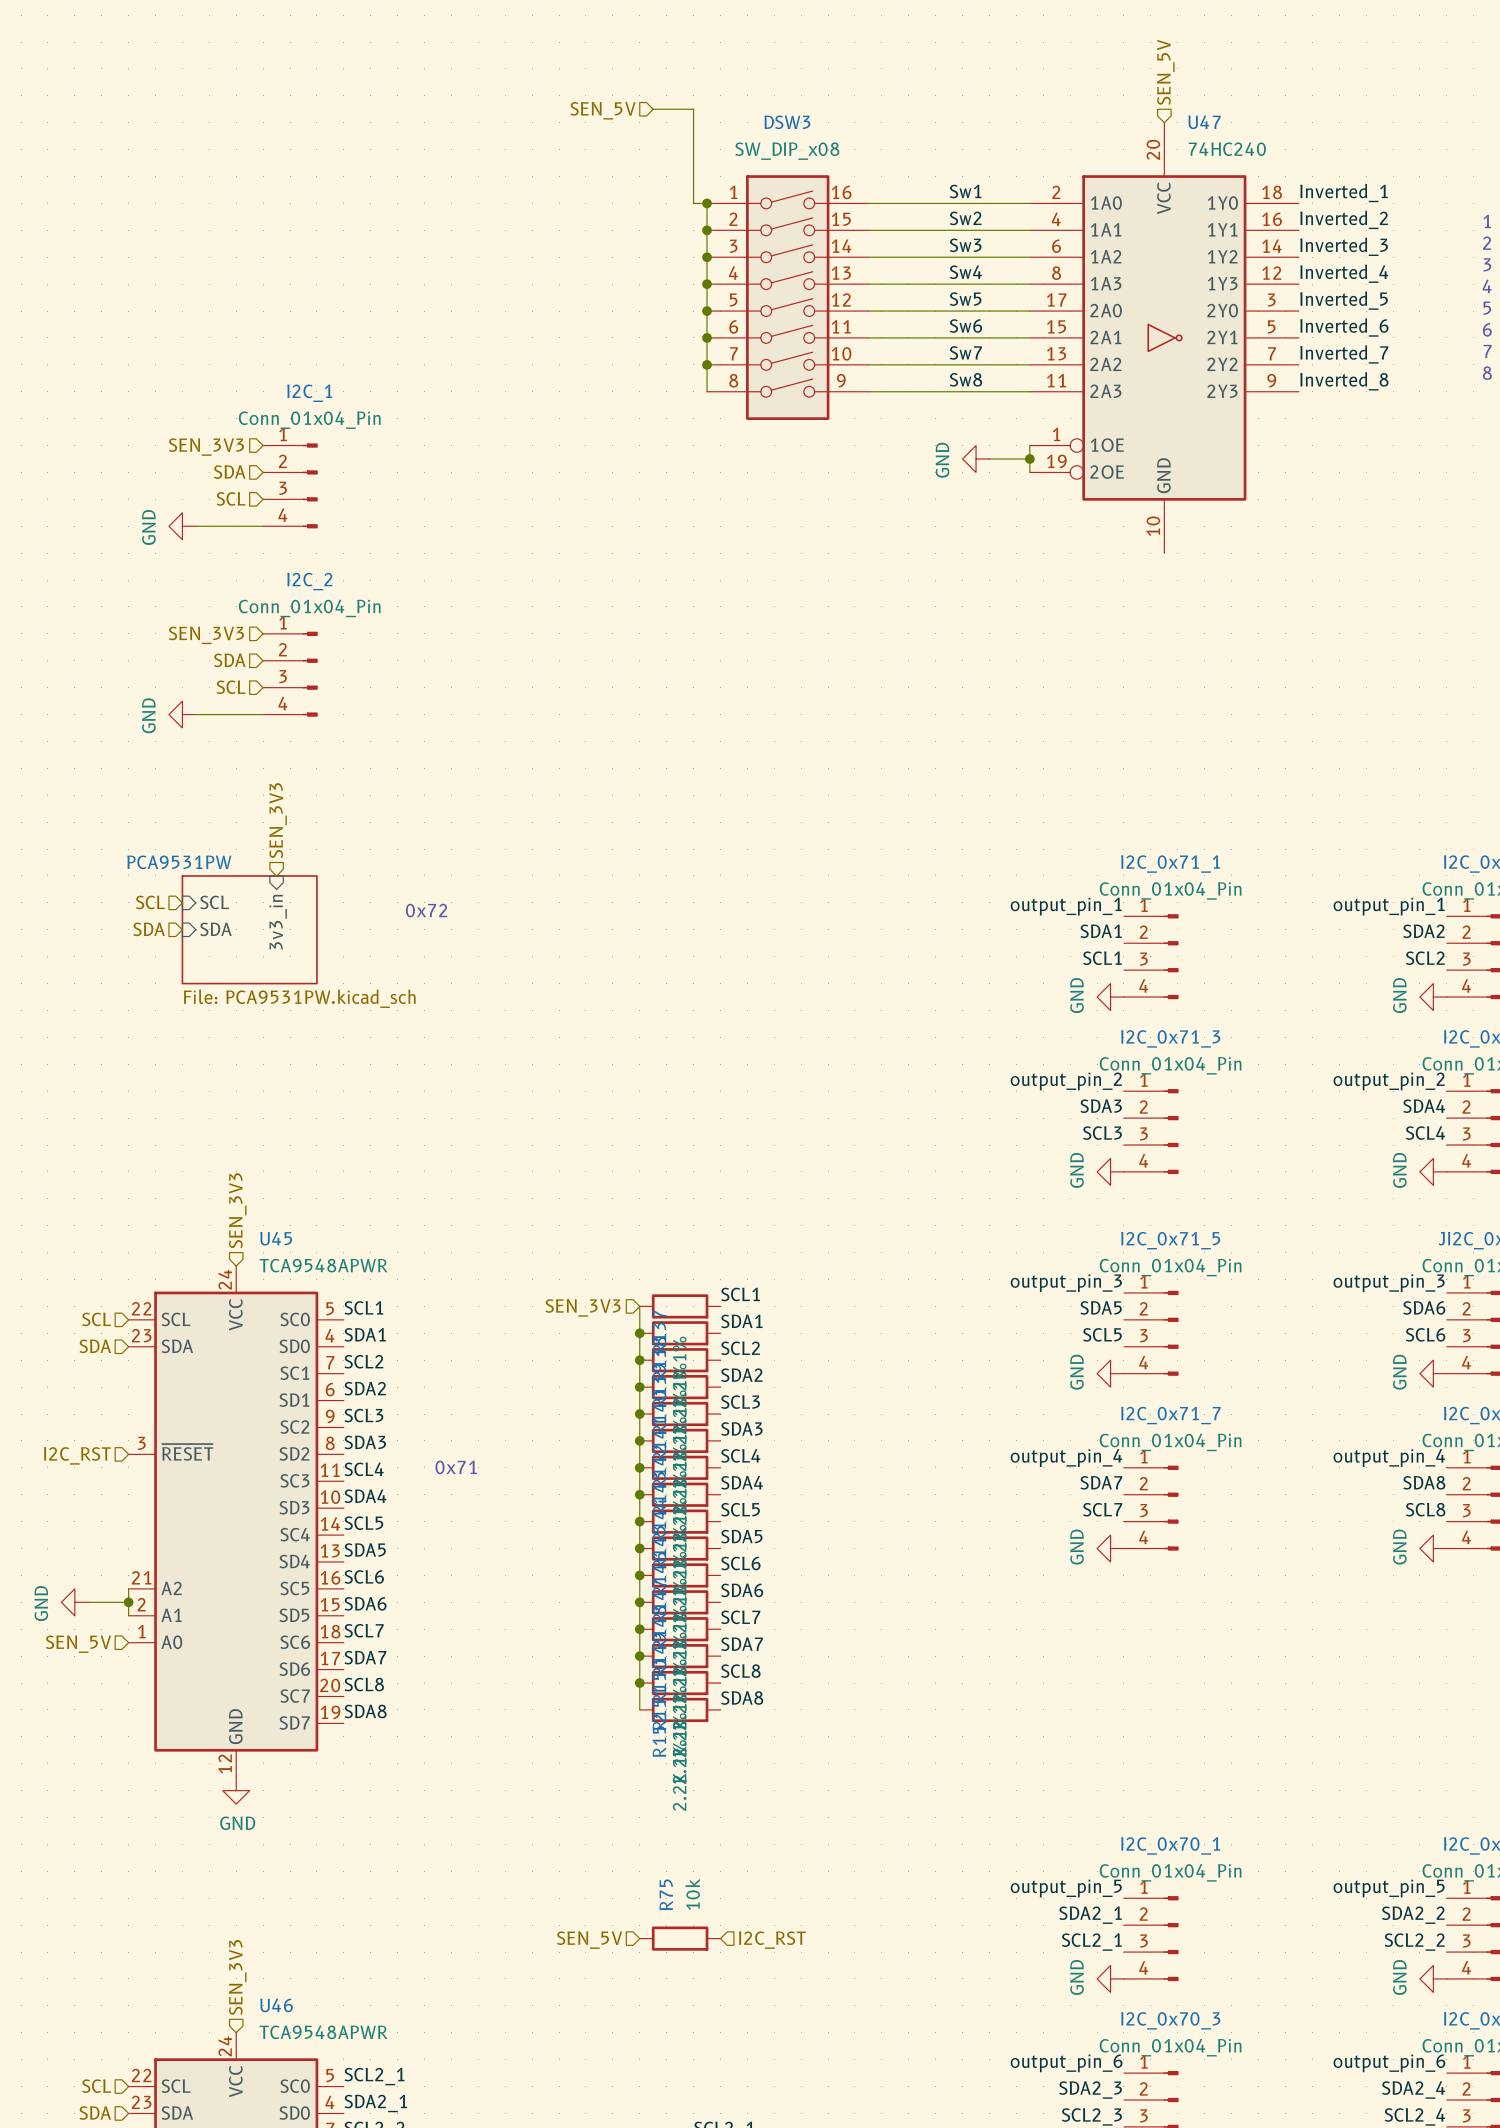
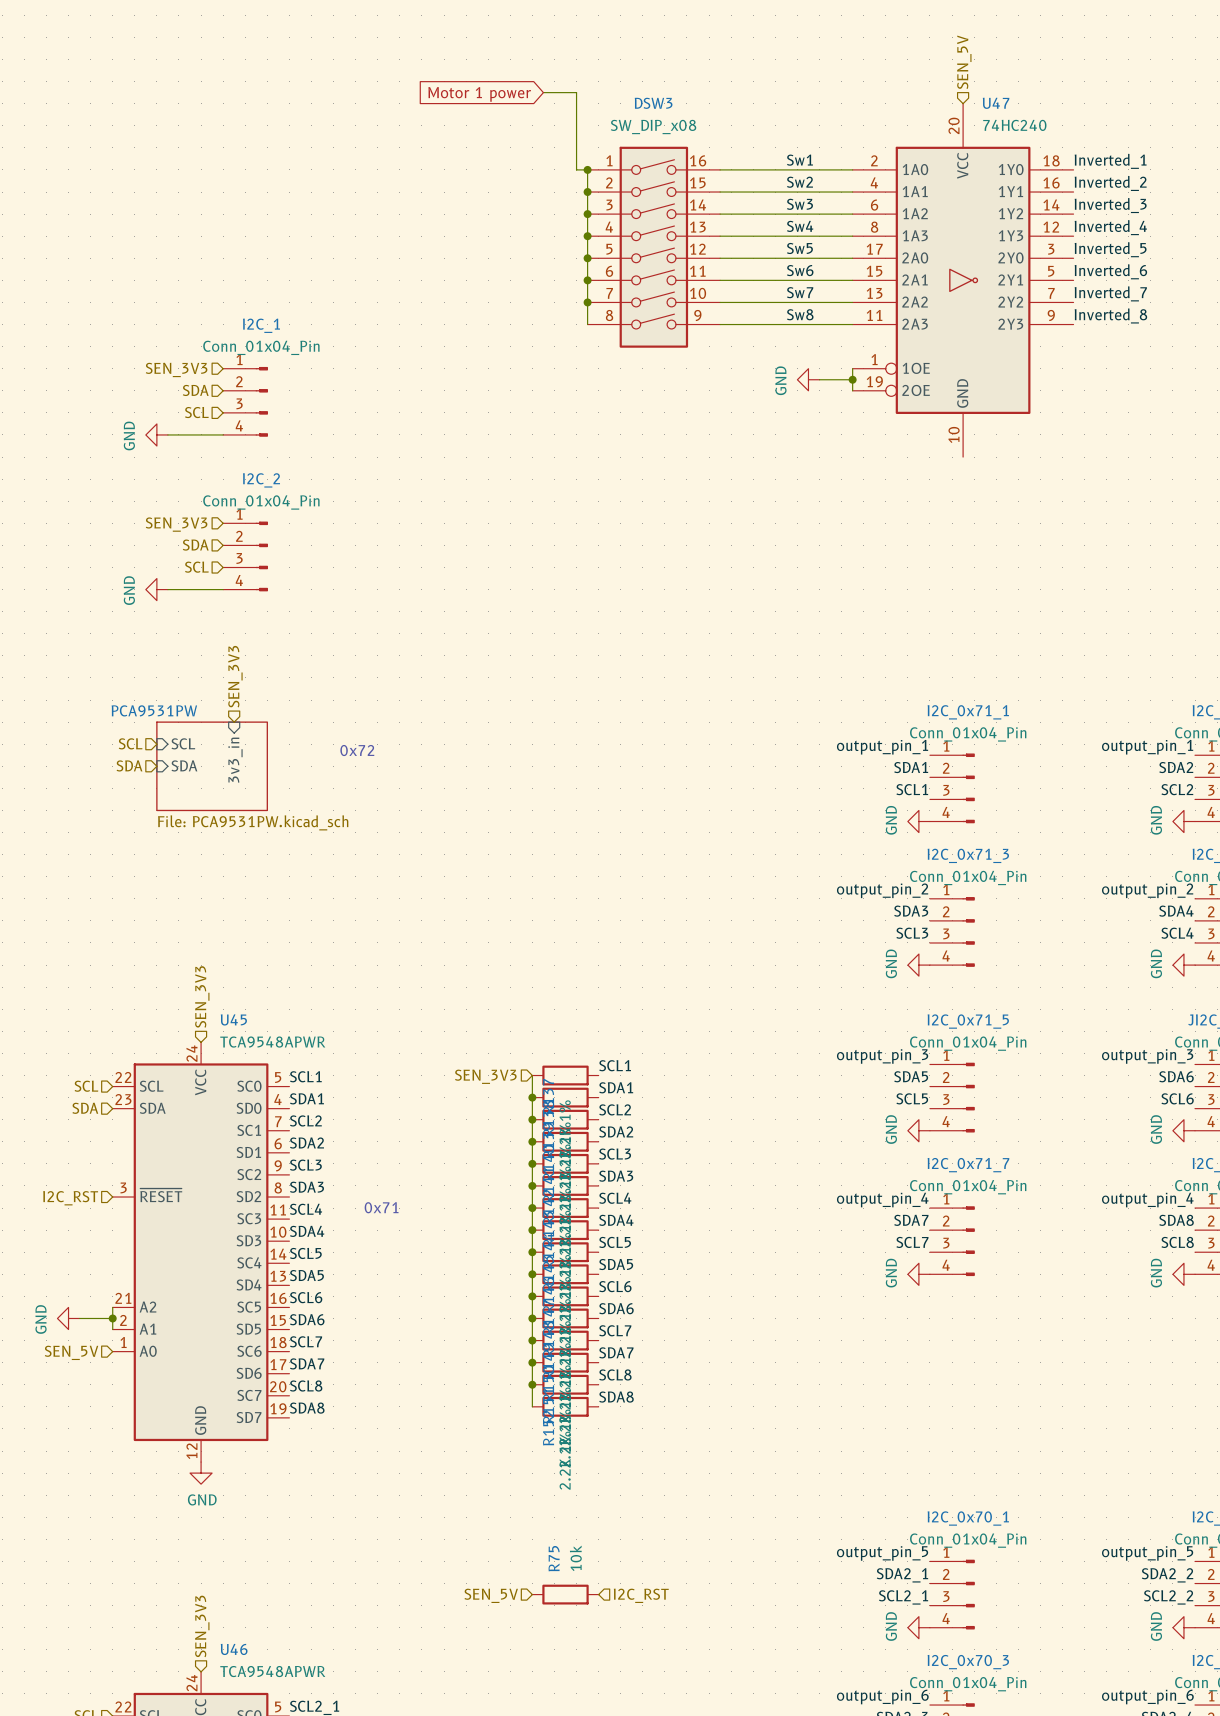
hierarchical label: SEN_5V (603, 110) -> none
global label: none -> Motor 1 power (479, 94)

